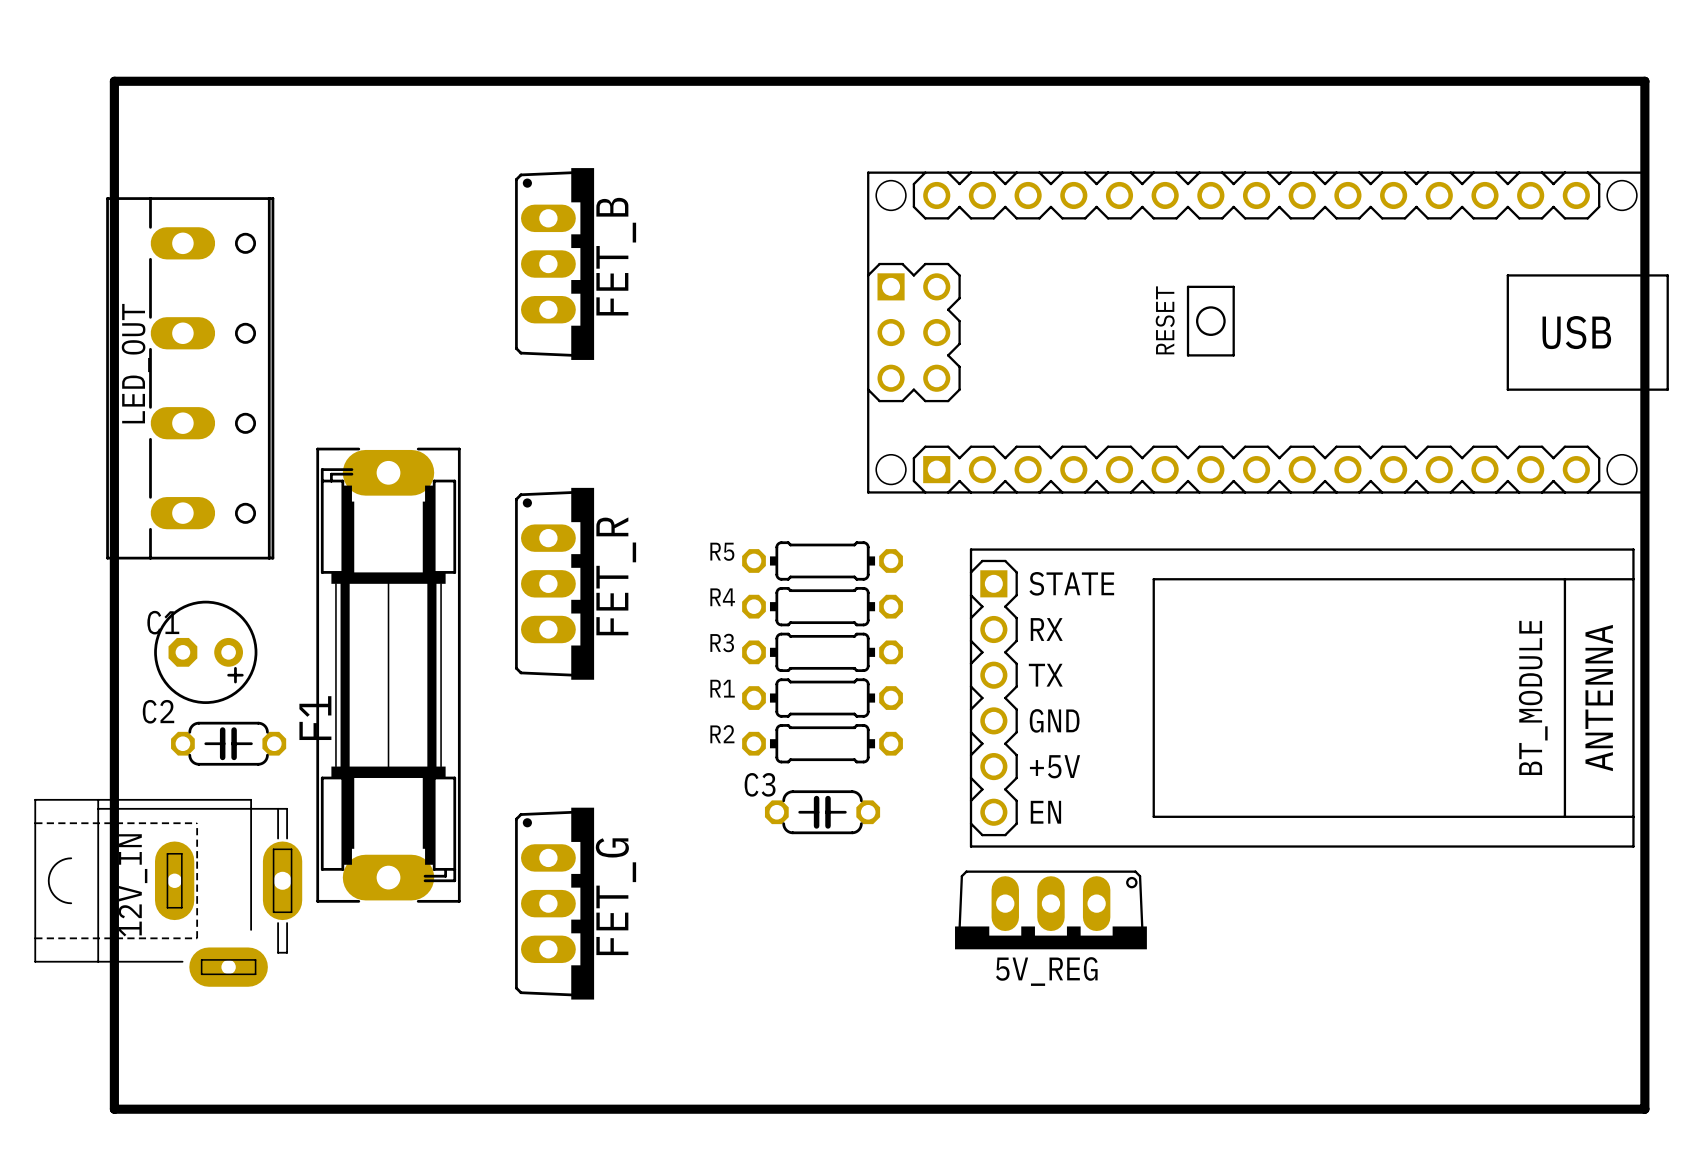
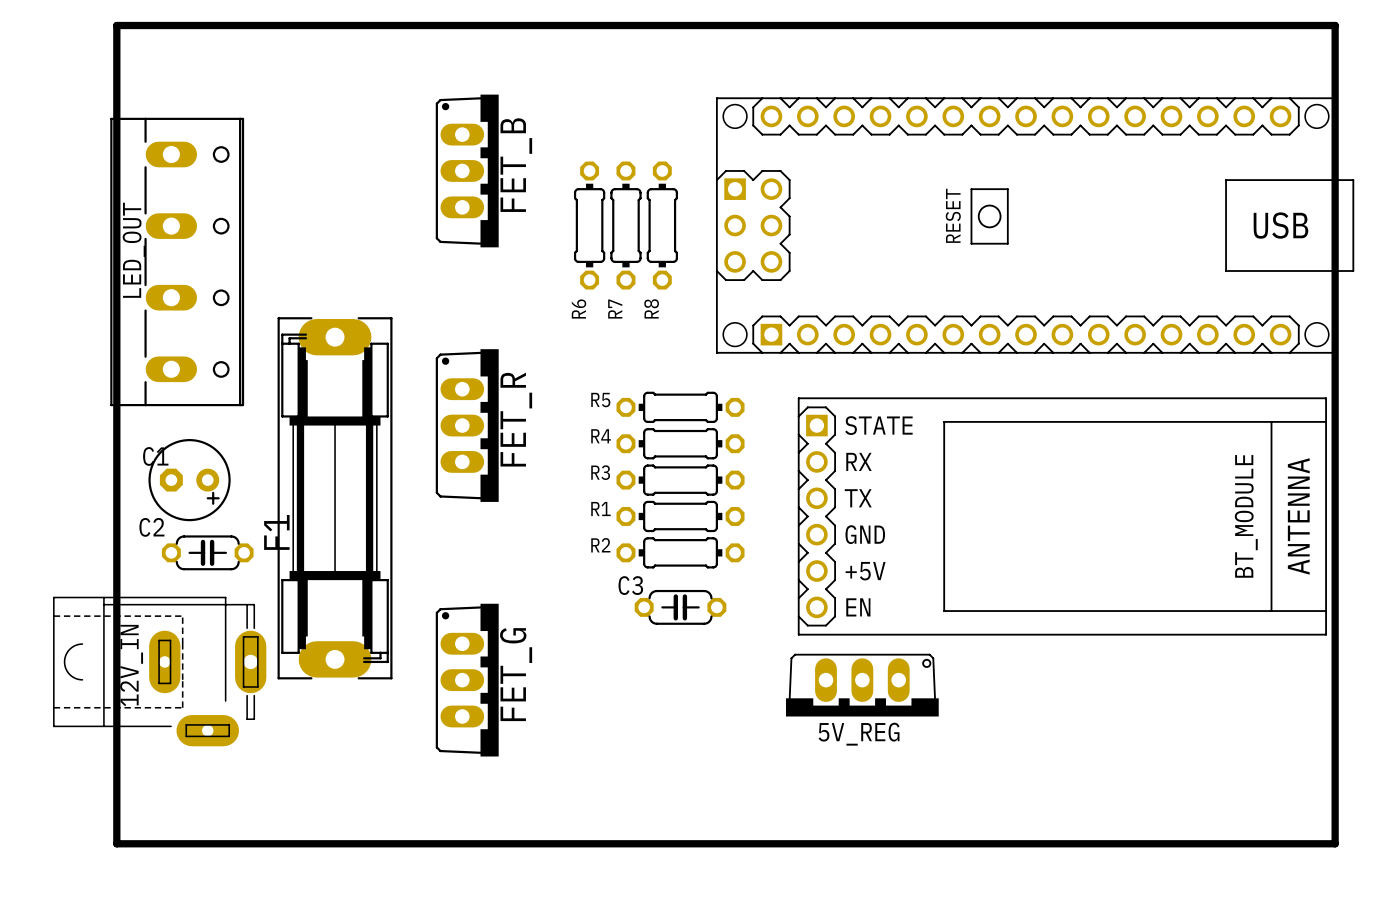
R6: none -> (589, 225)
R7: none -> (625, 225)
R8: none -> (662, 225)

